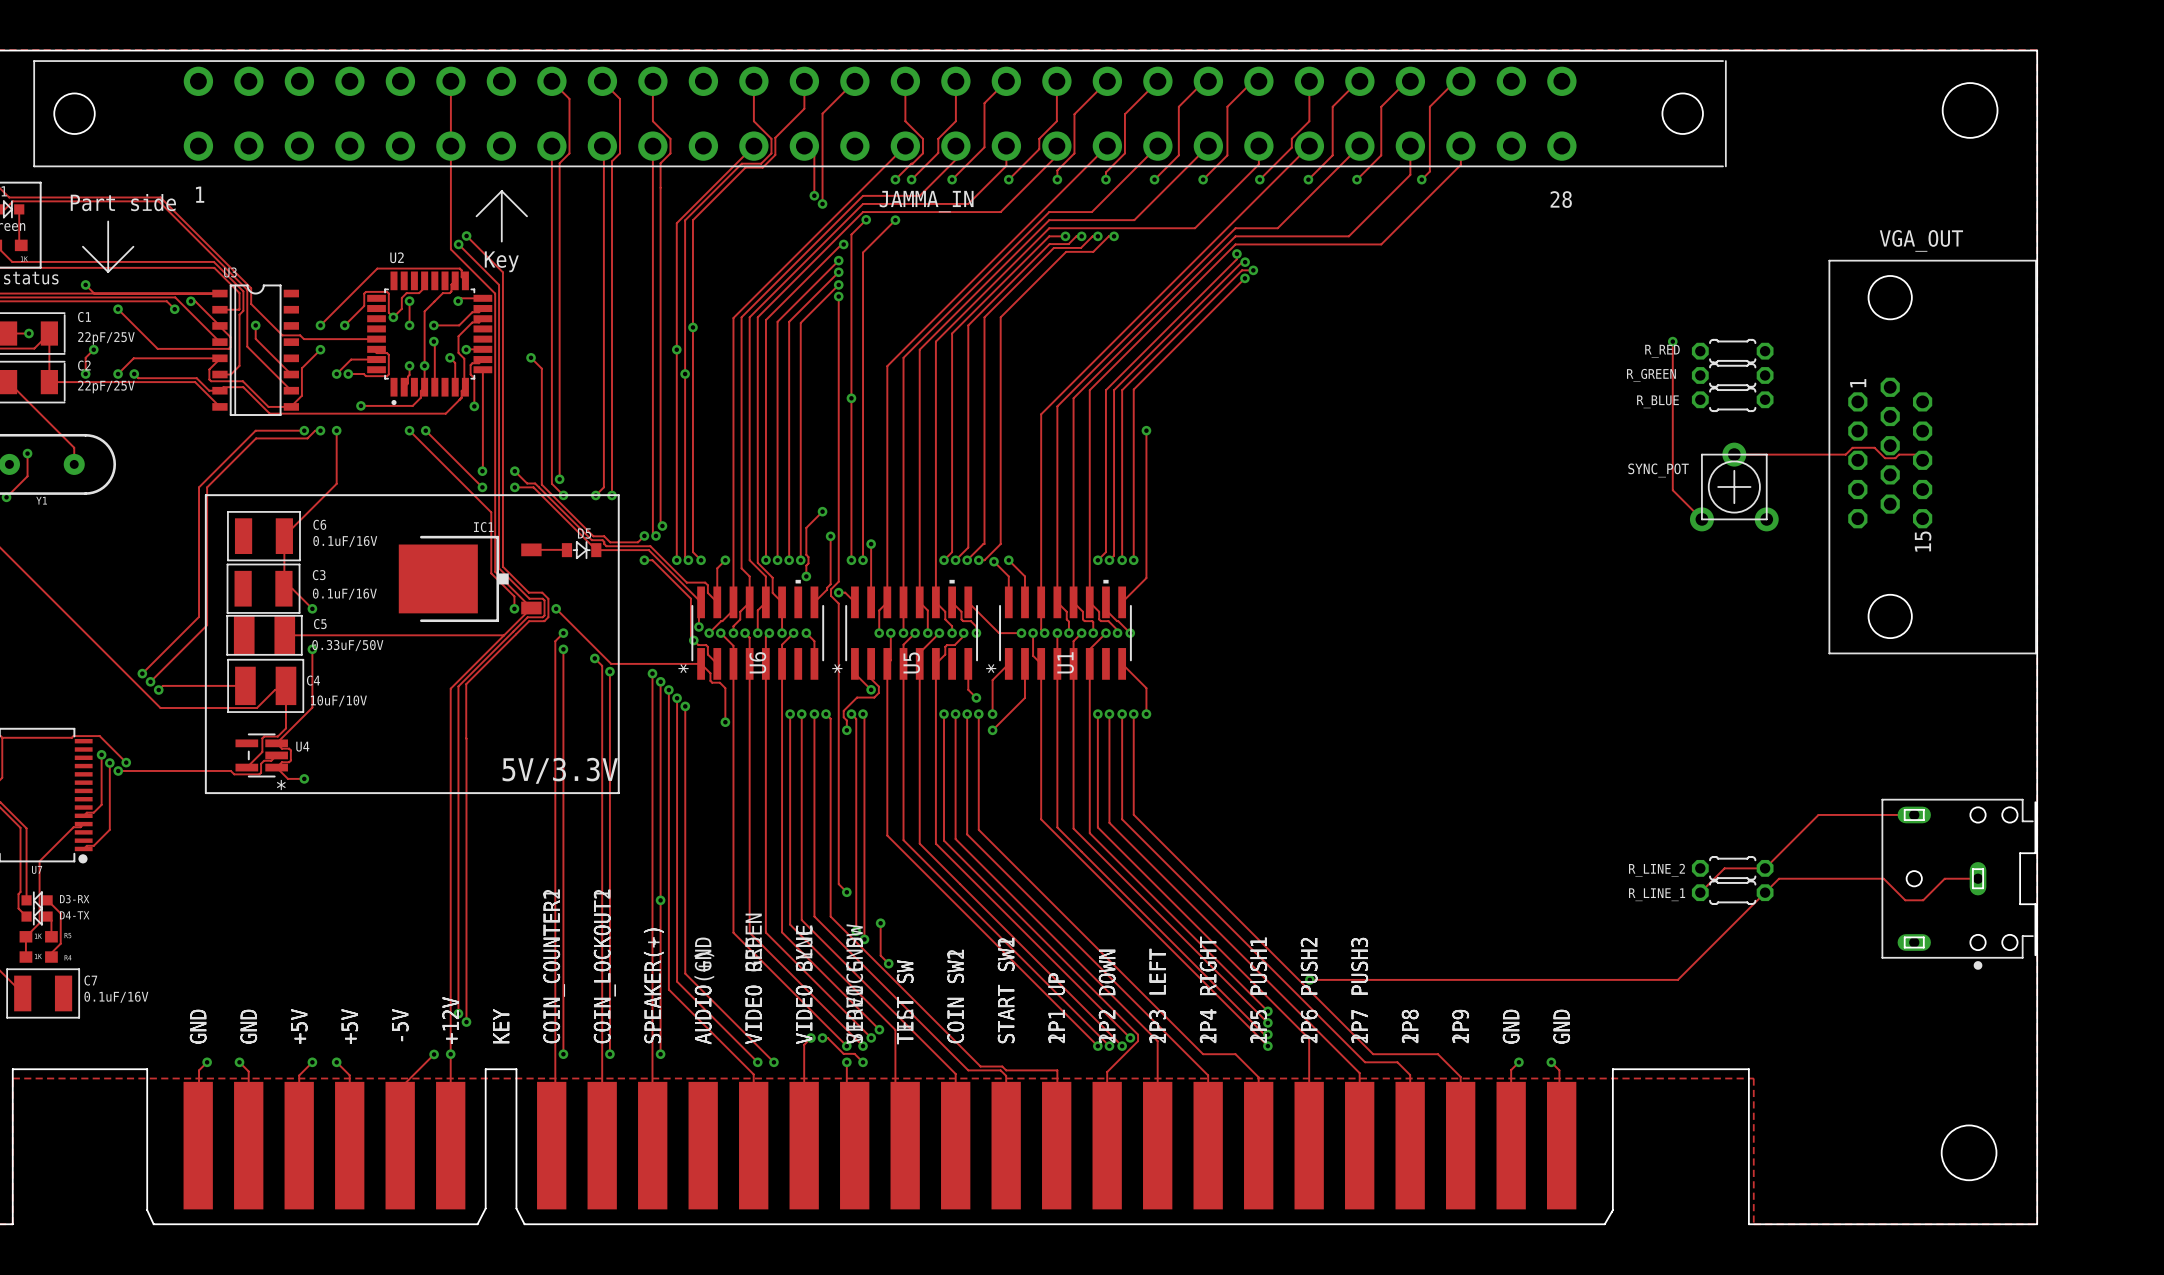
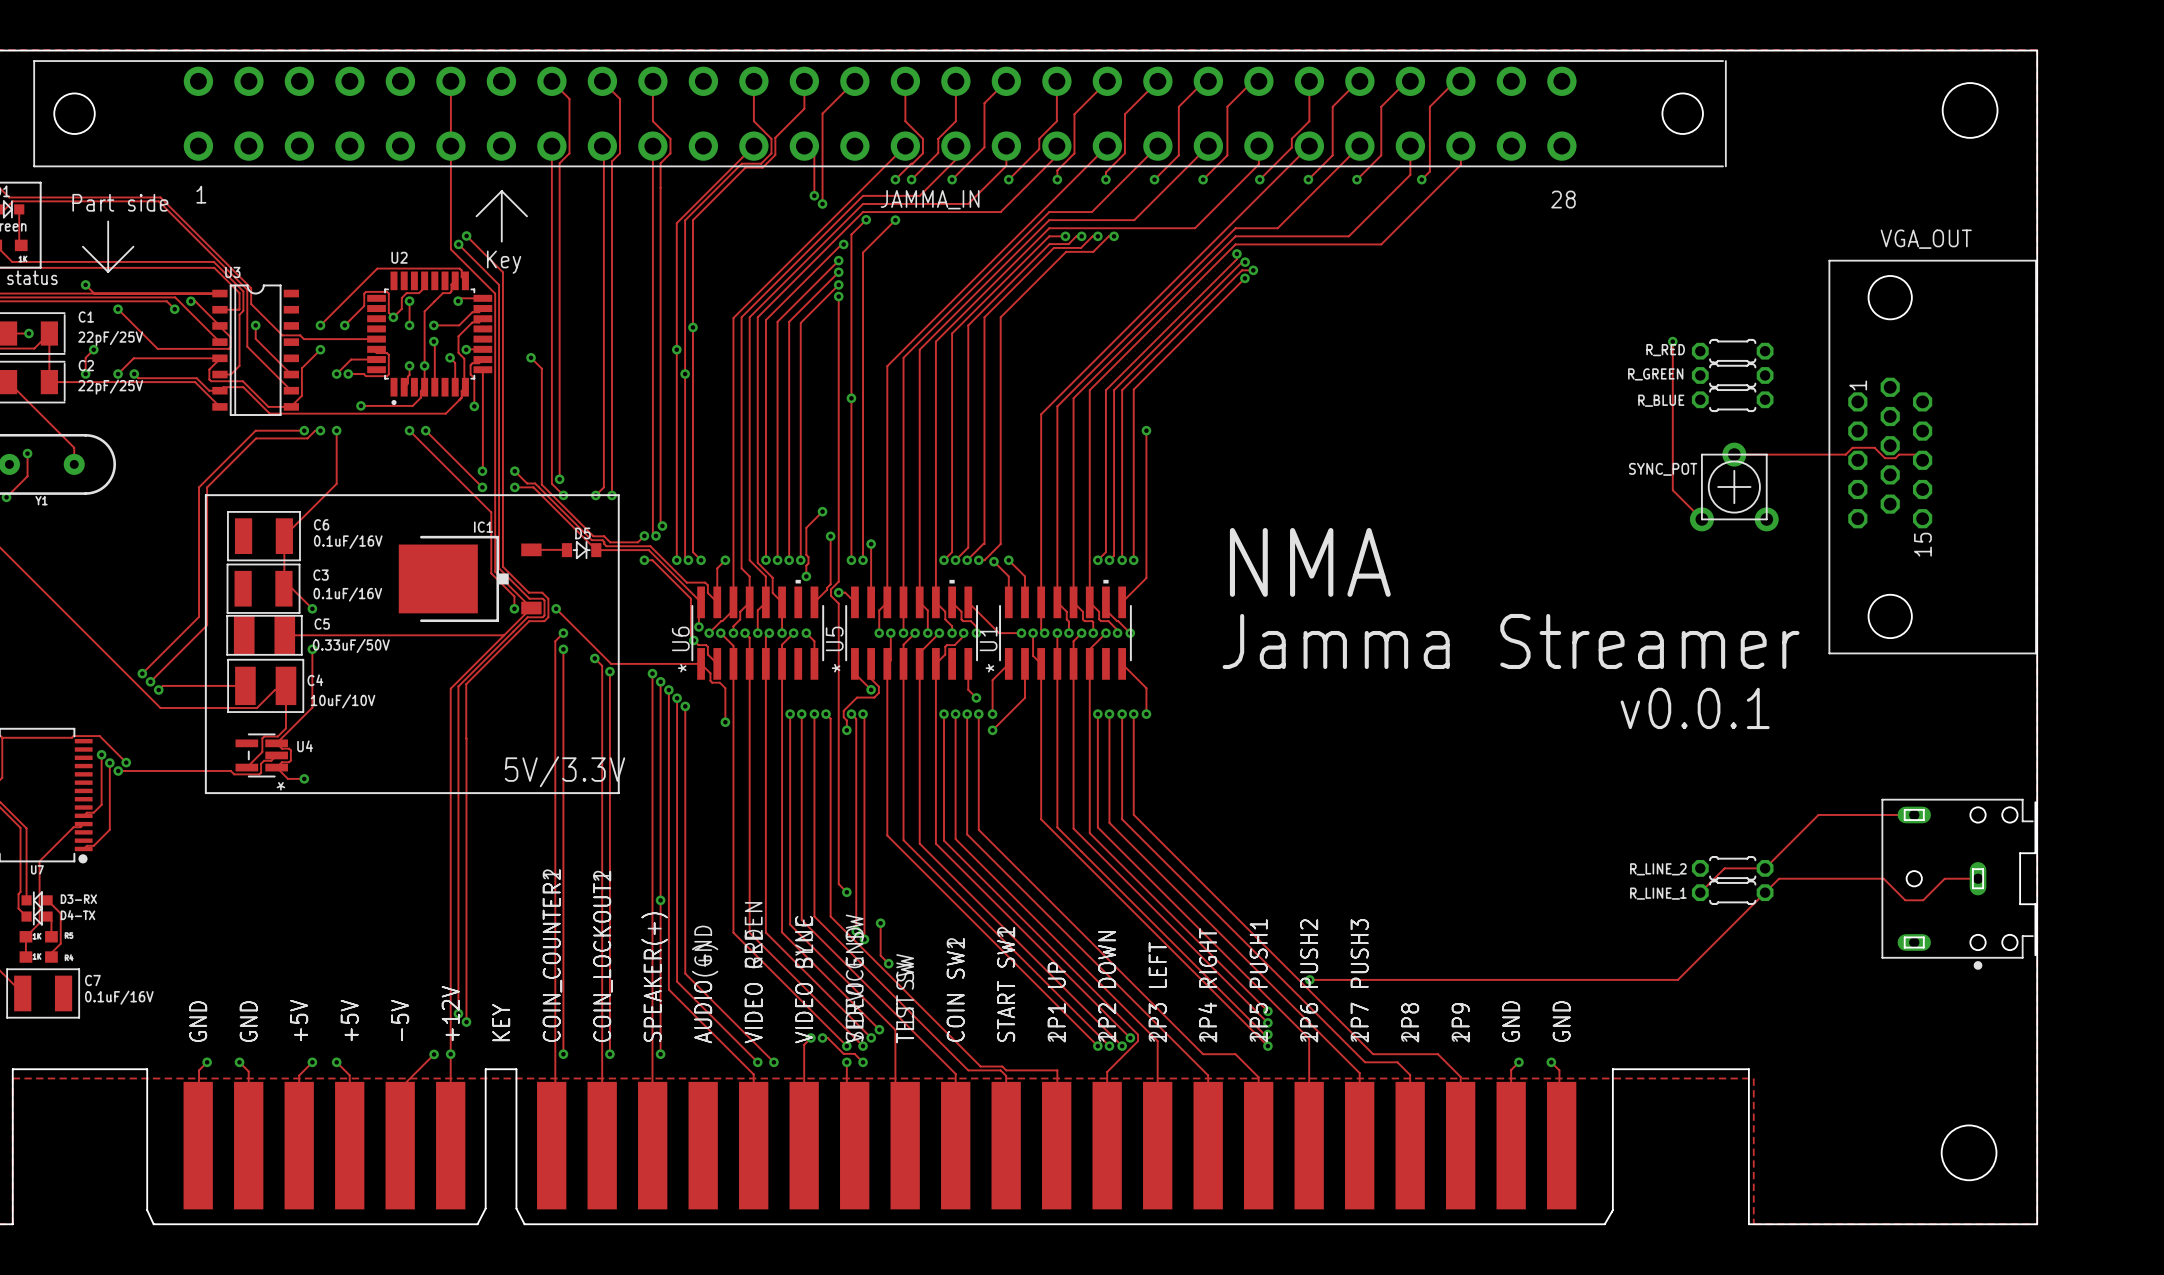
text: none -> NMA (1310, 562)
text: none -> Jamma Streamer (1511, 641)
U6 name position: U6 (757, 662) -> U6 (680, 638)
U5 name position: U5 (911, 662) -> U5 (834, 638)
U1 name position: U1 (1065, 662) -> U1 (988, 638)
text: none -> v0.0.1 (1695, 708)

